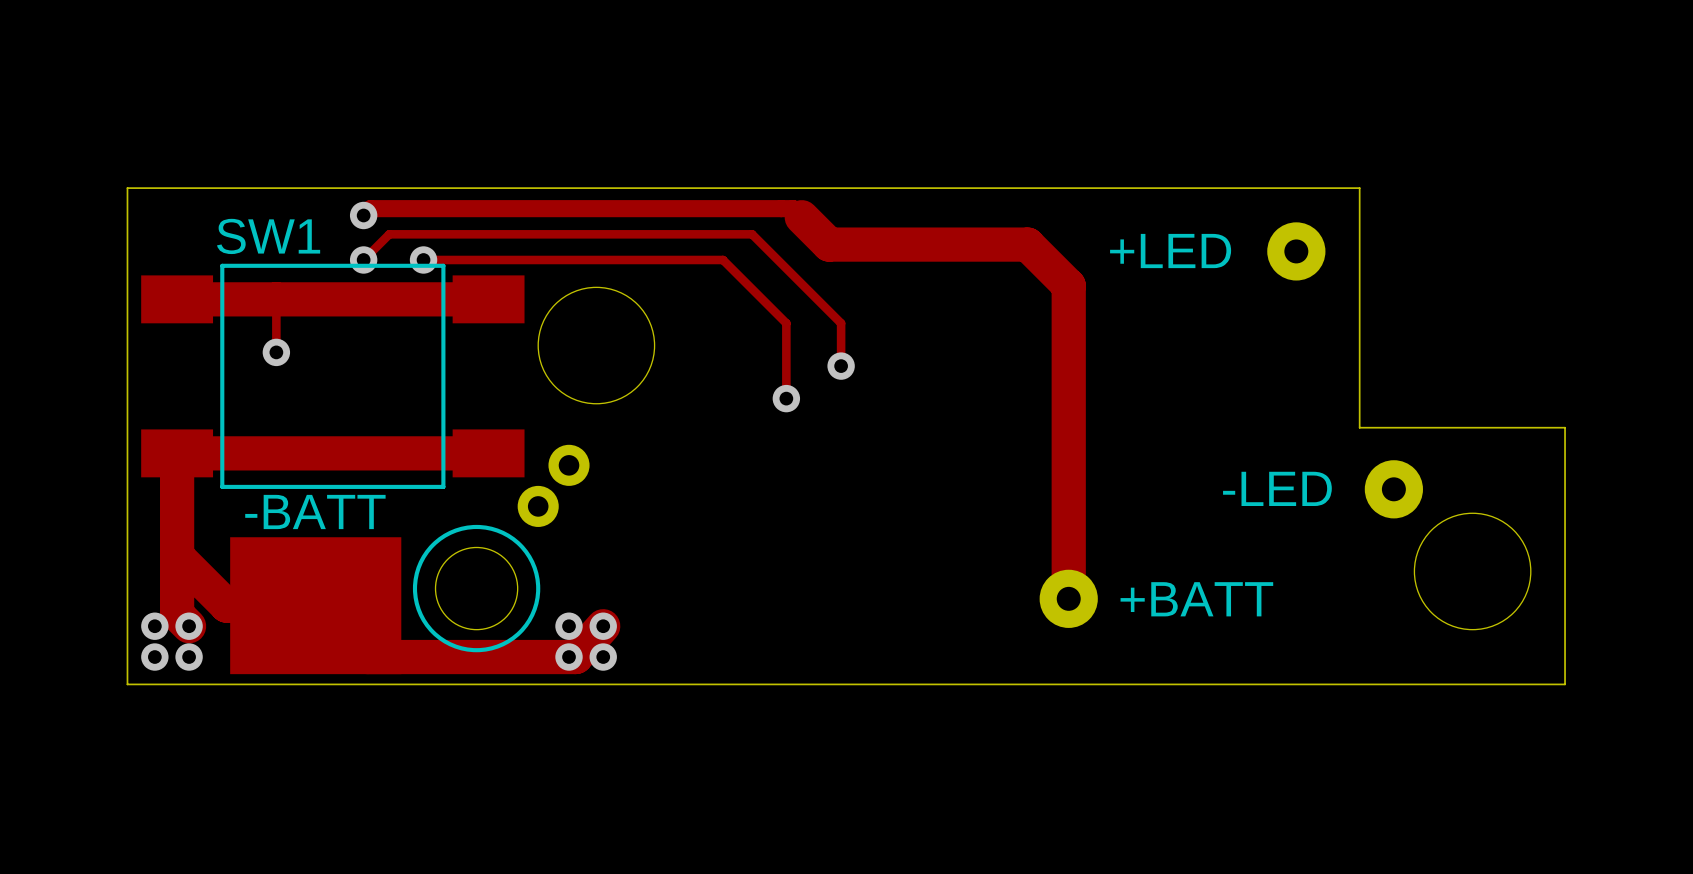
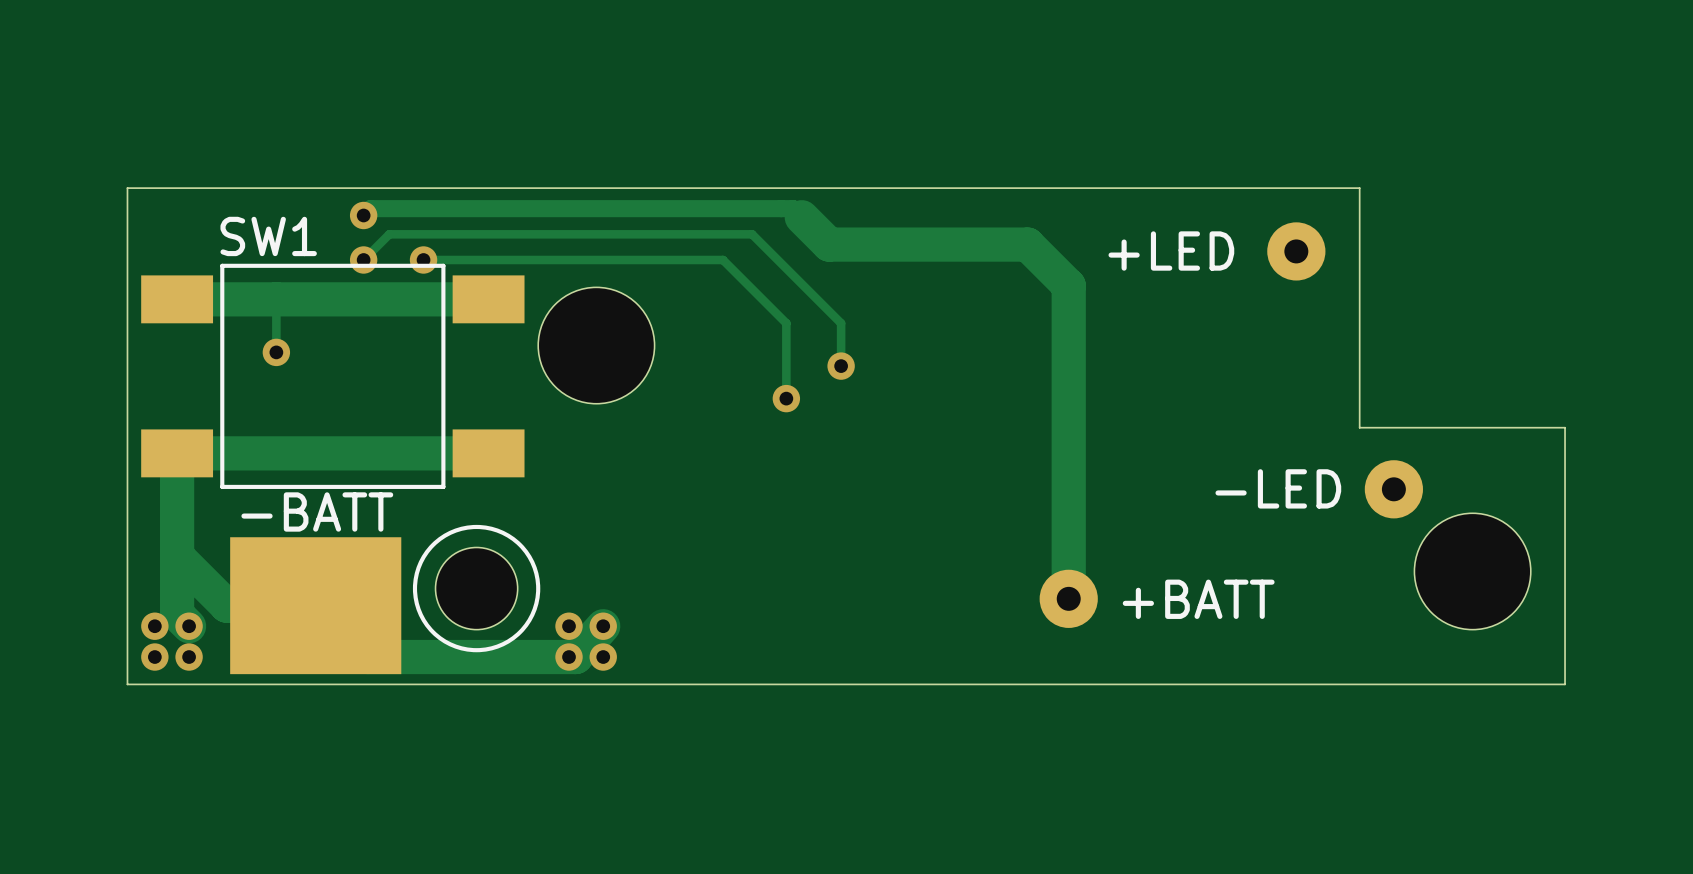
part: (569, 465) -> none
part: (538, 506) -> none

